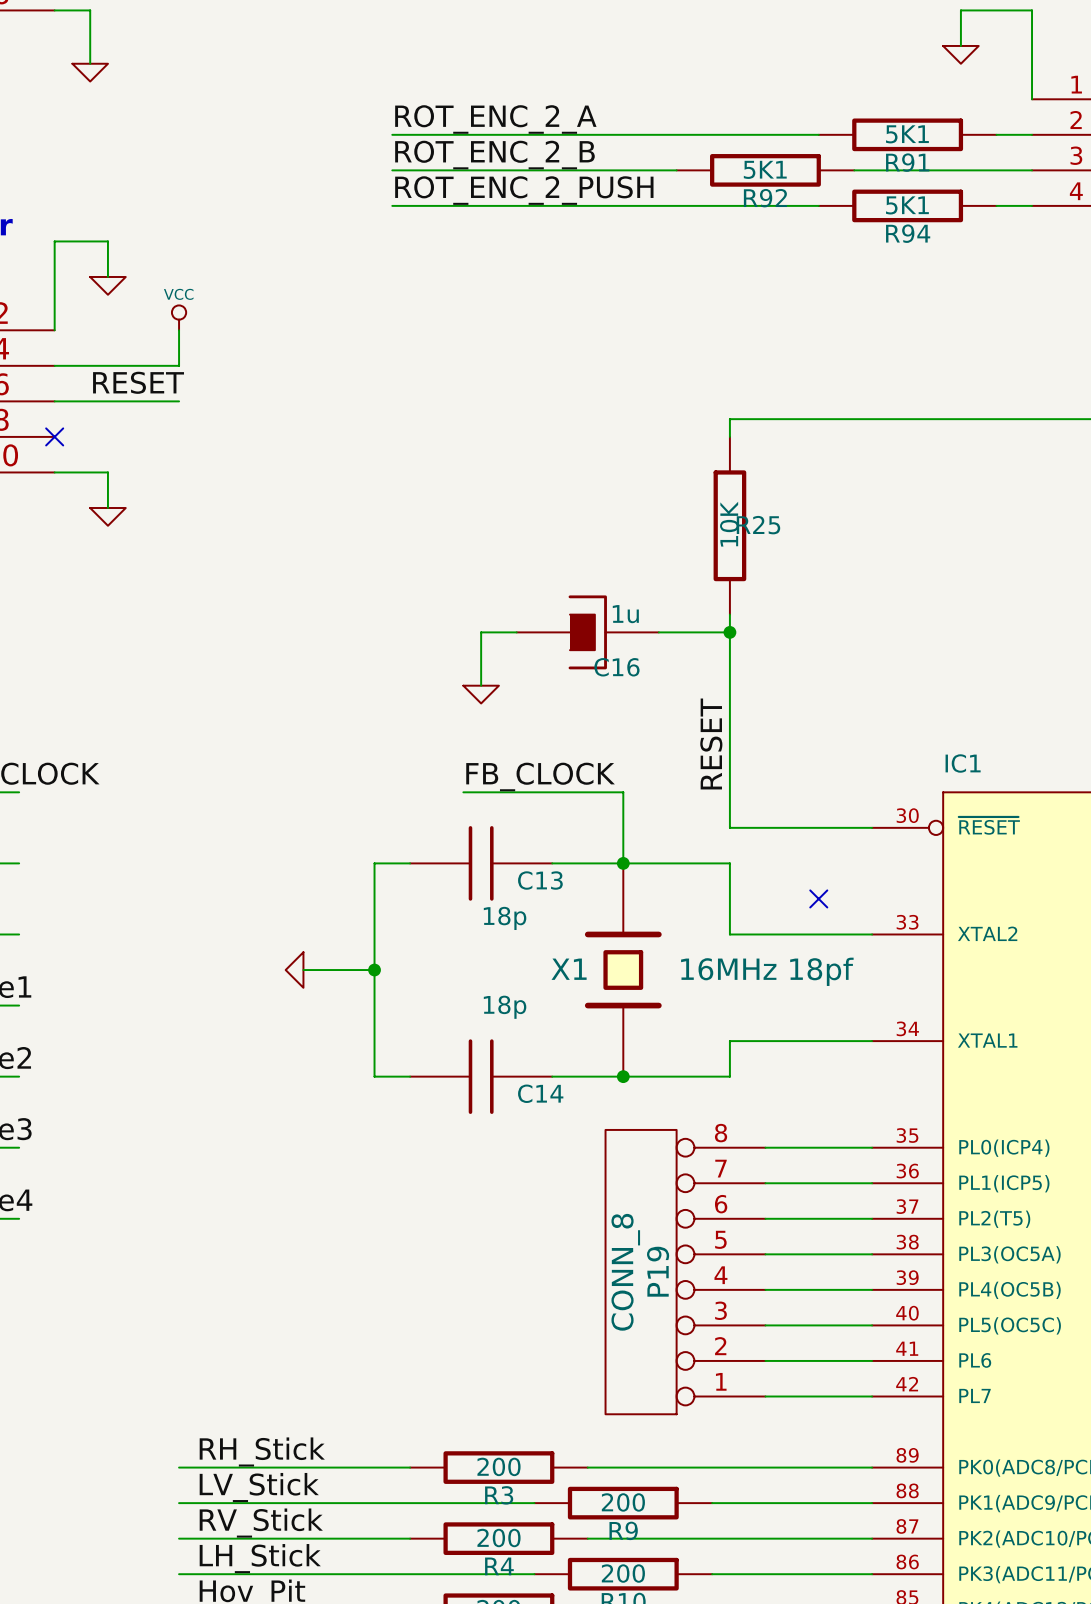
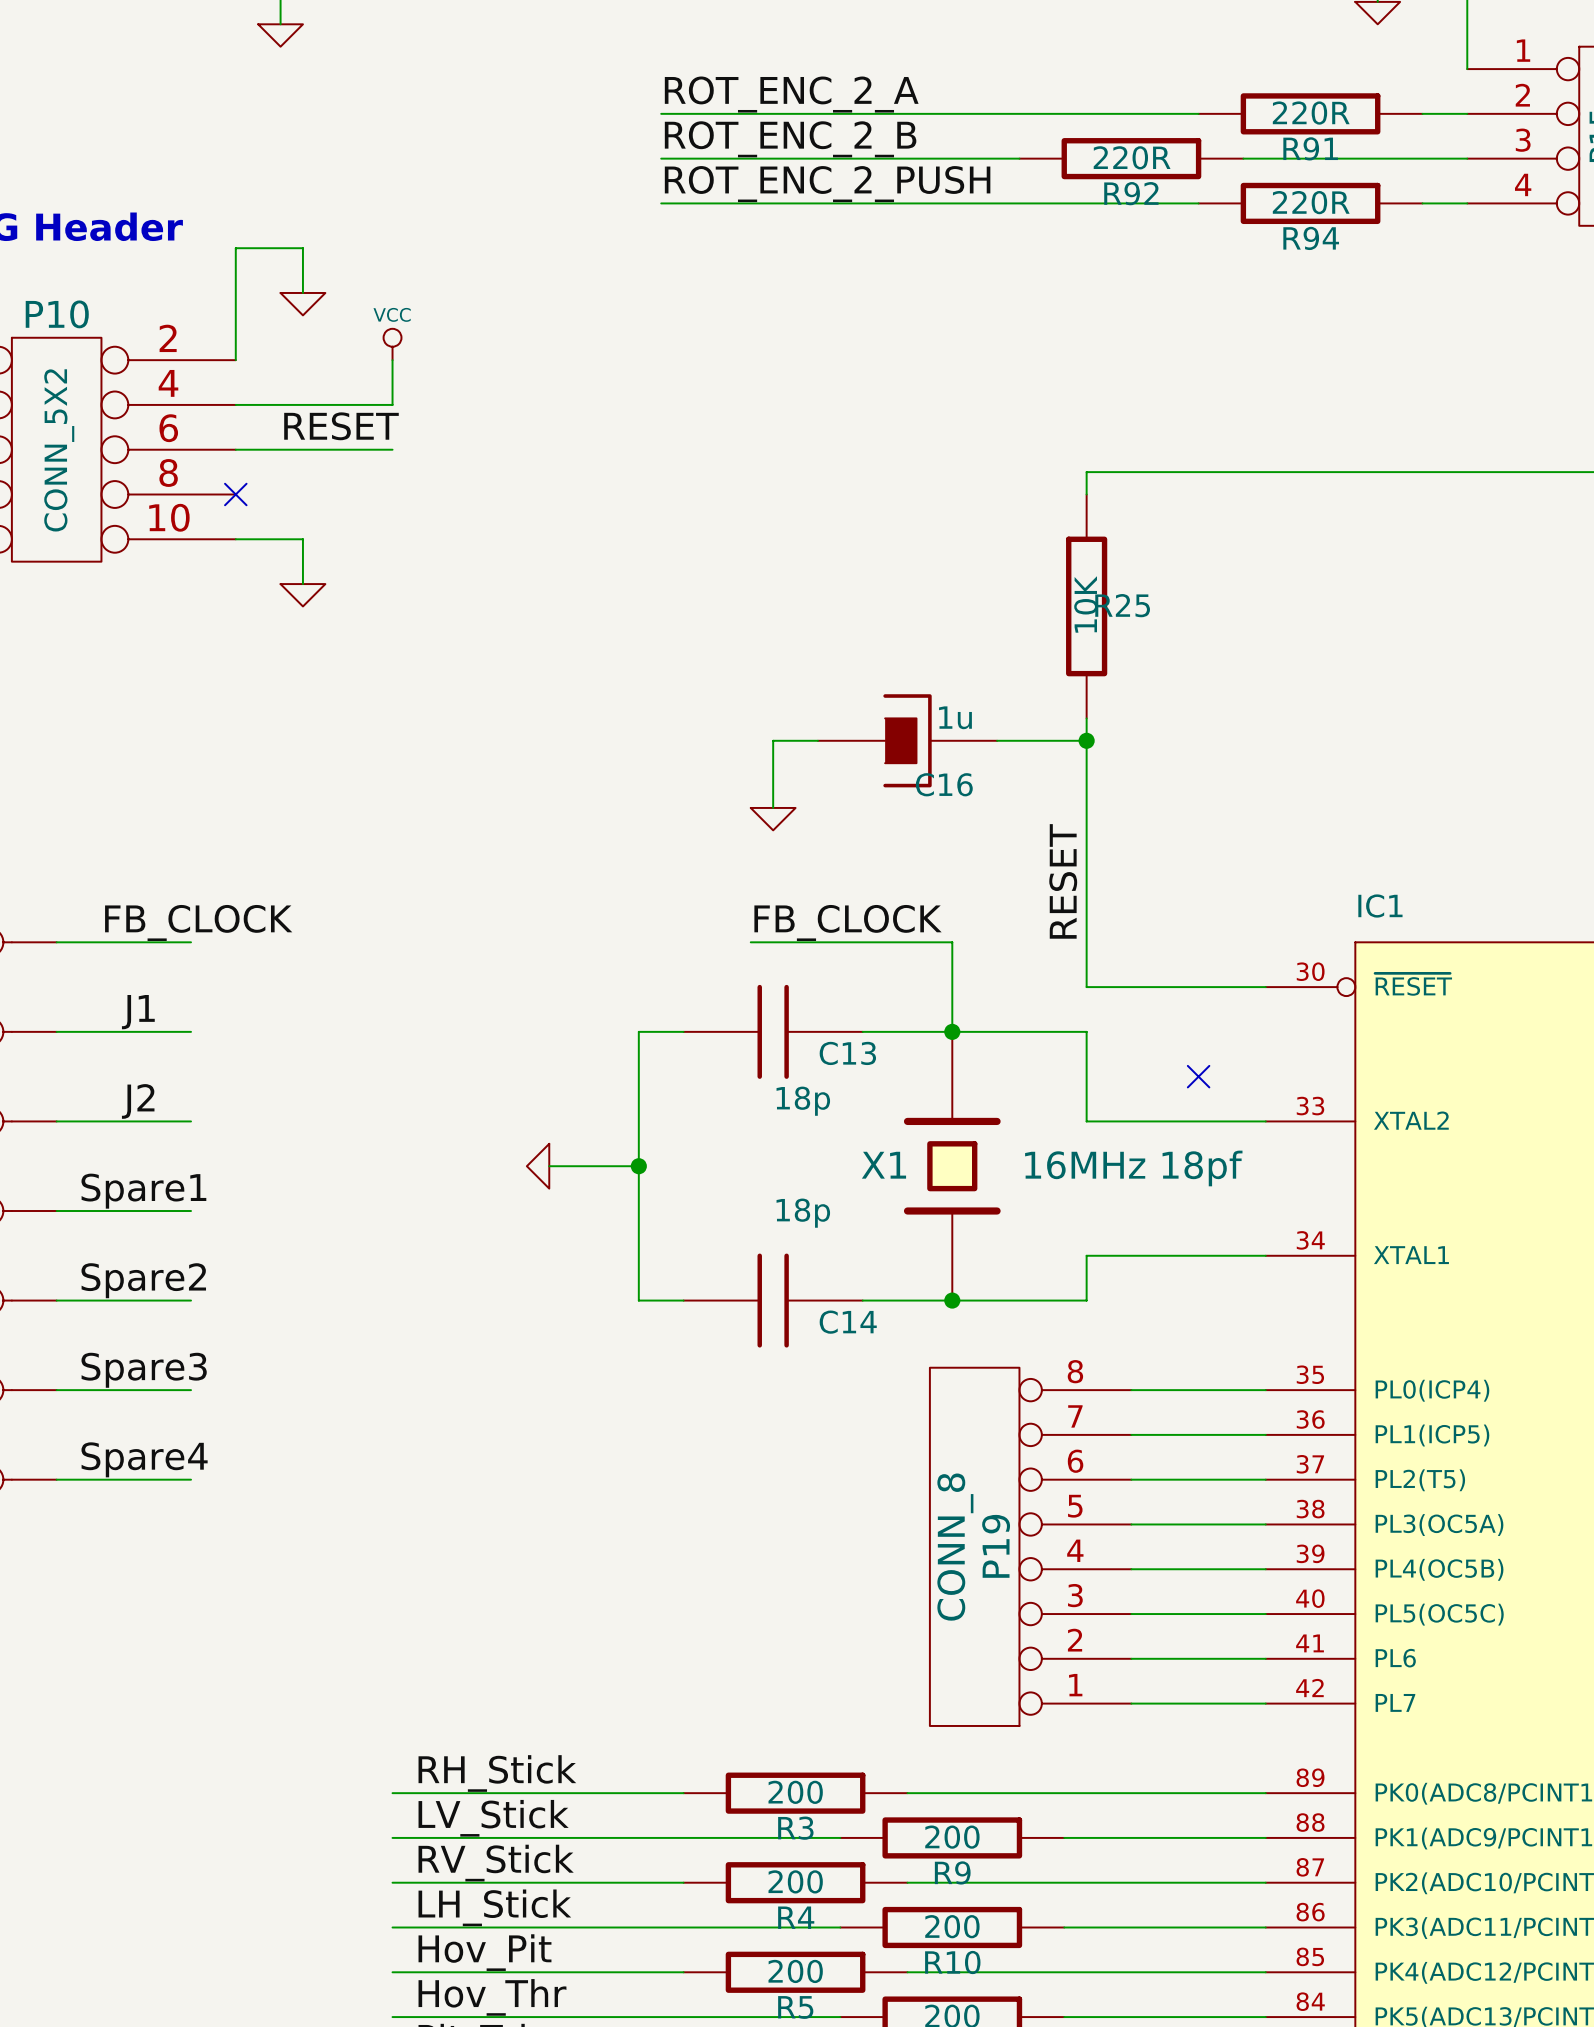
R91 value: 5K1 (907, 134) -> 220R (1311, 113)
R92 value: 5K1 (765, 169) -> 220R (1132, 157)
R94 value: 5K1 (907, 205) -> 220R (1311, 202)

